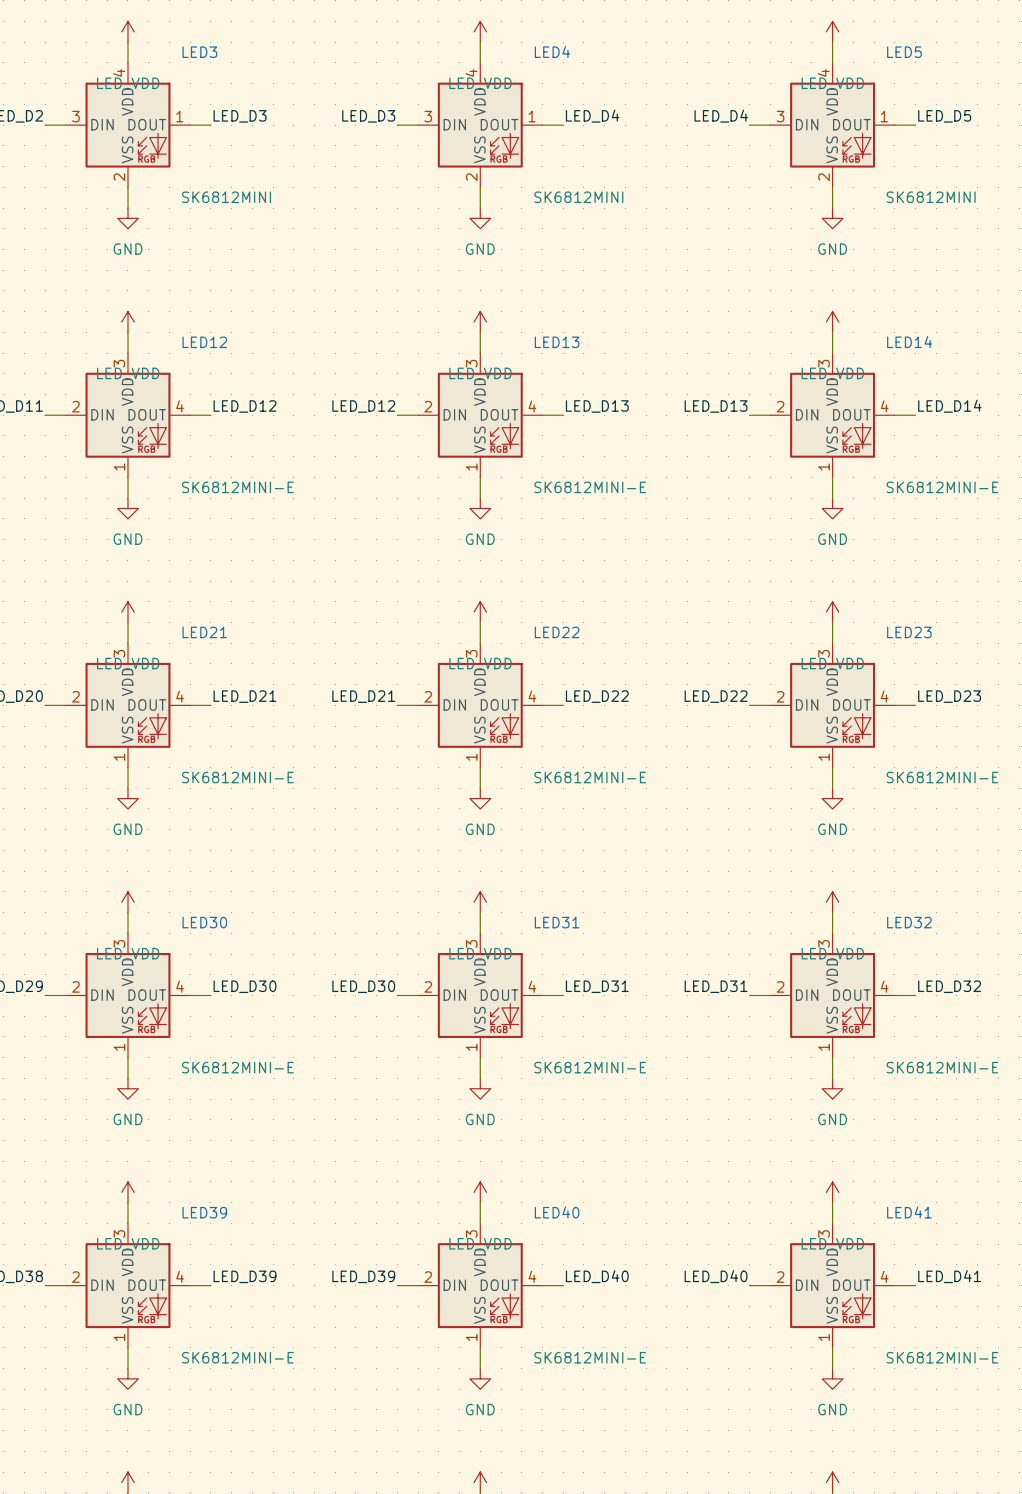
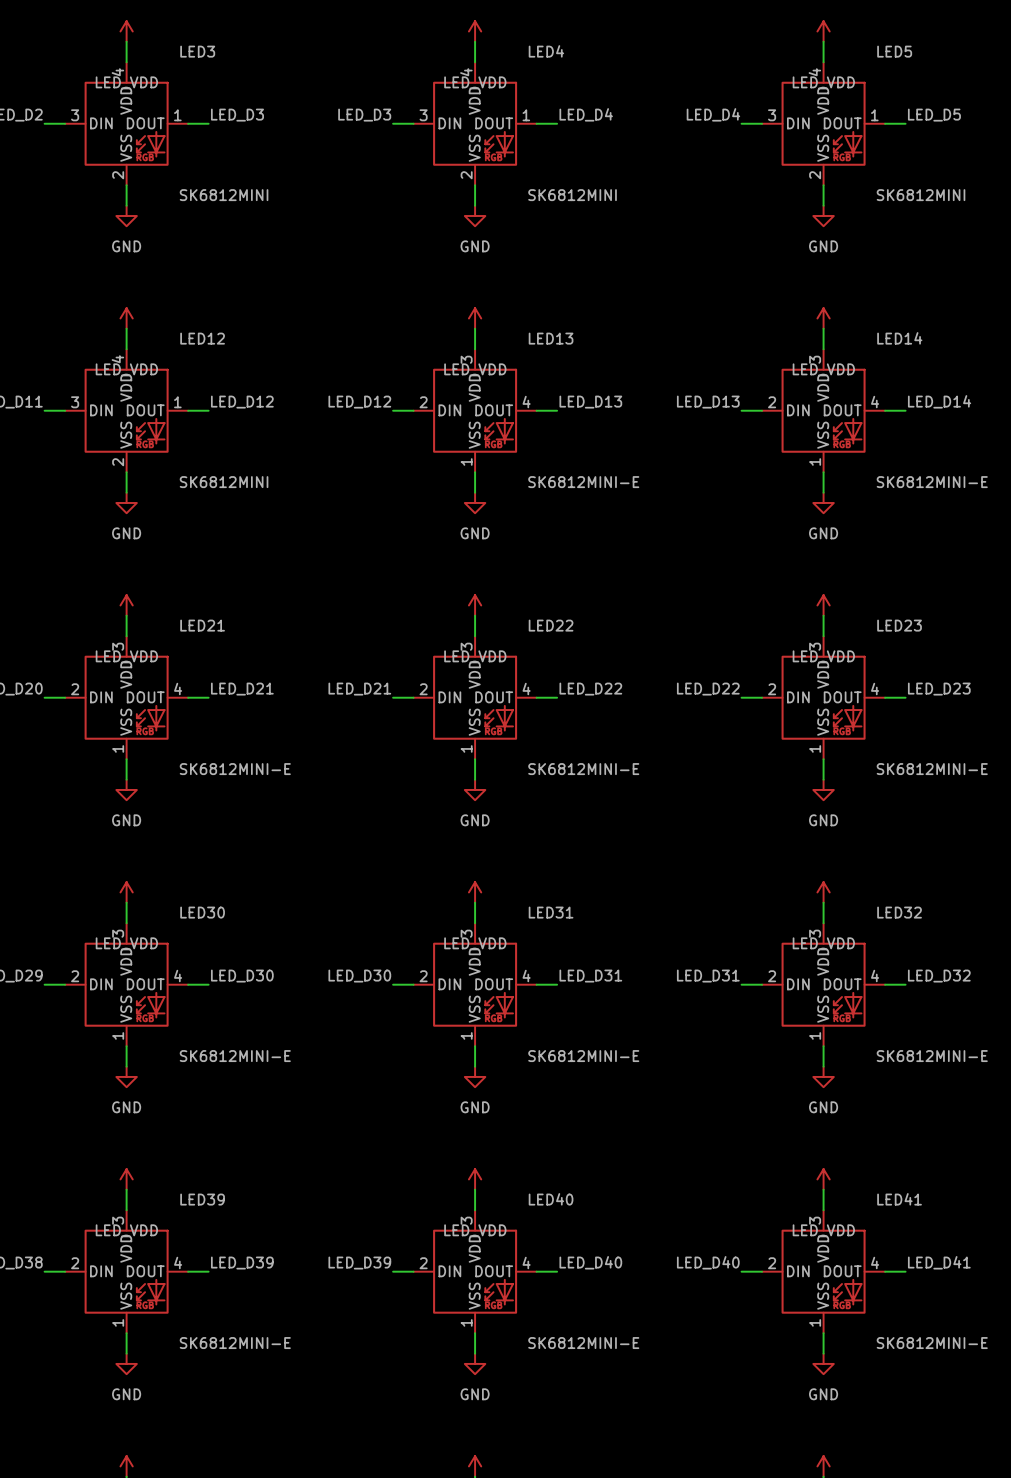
LED12 pin number: 3 (119, 363) -> 4 (117, 359)
LED12 pin number: 2 (75, 406) -> 3 (75, 402)
LED12 pin number: 4 (180, 406) -> 1 (177, 402)
LED12 pin number: 1 (119, 467) -> 2 (118, 462)
LED12 value: SK6812MINI-E (237, 487) -> SK6812MINI (224, 482)

